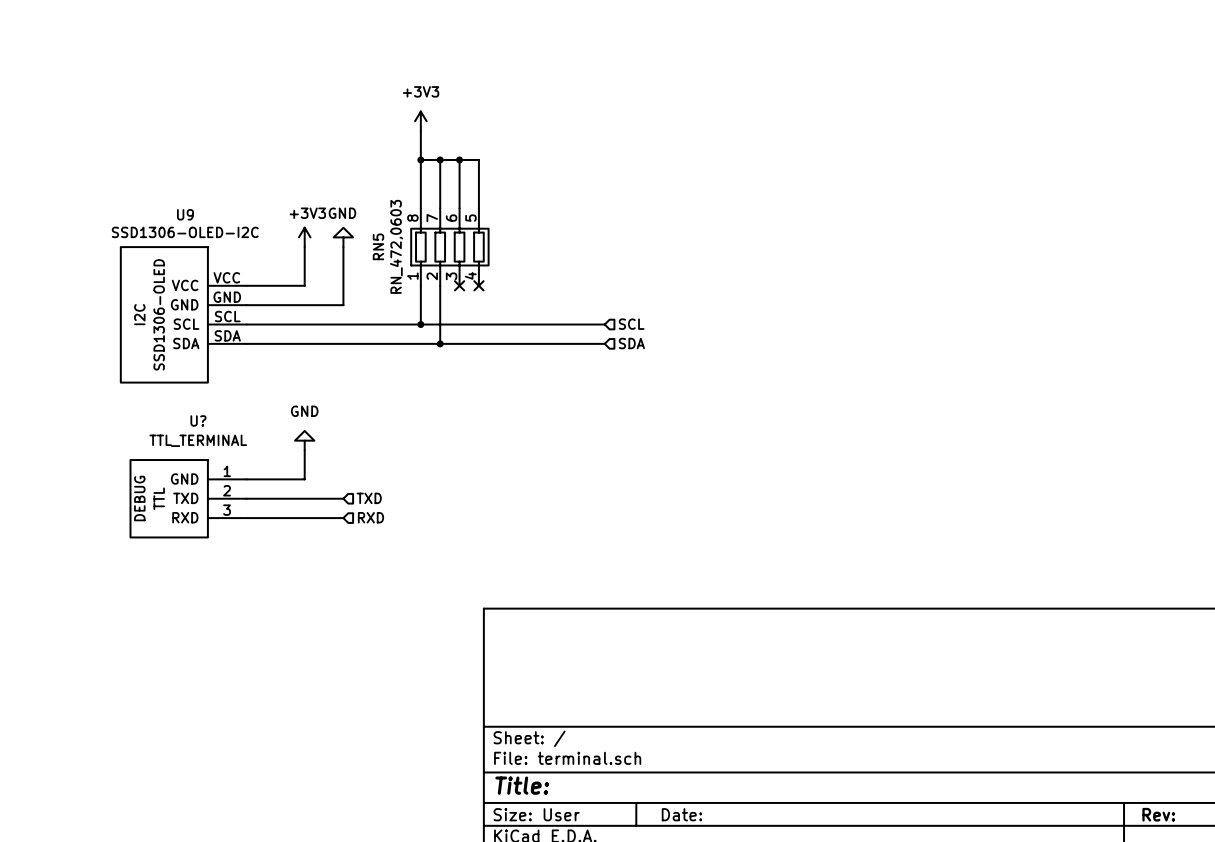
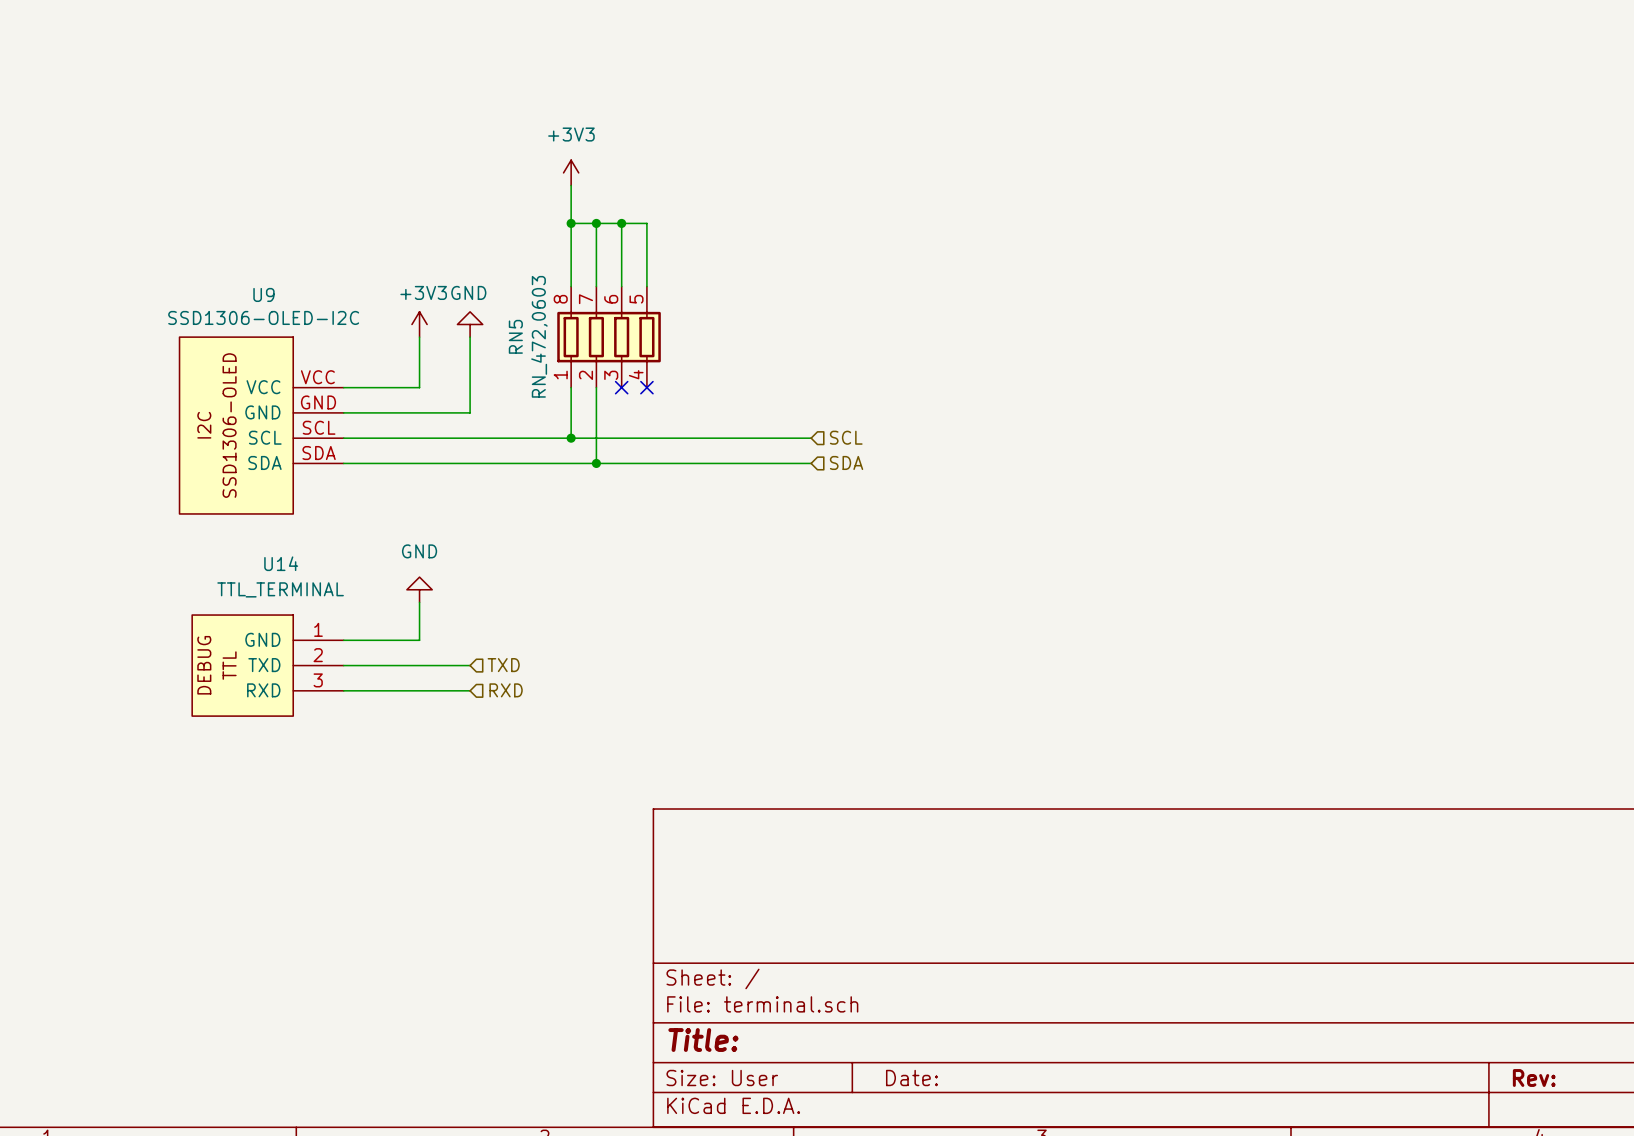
U? name: U? (198, 420) -> U14 (281, 563)

